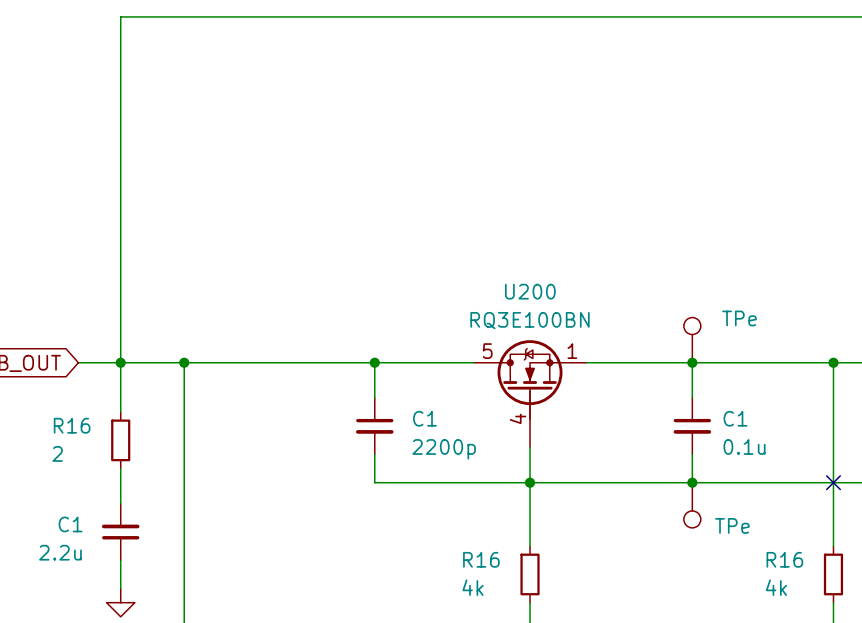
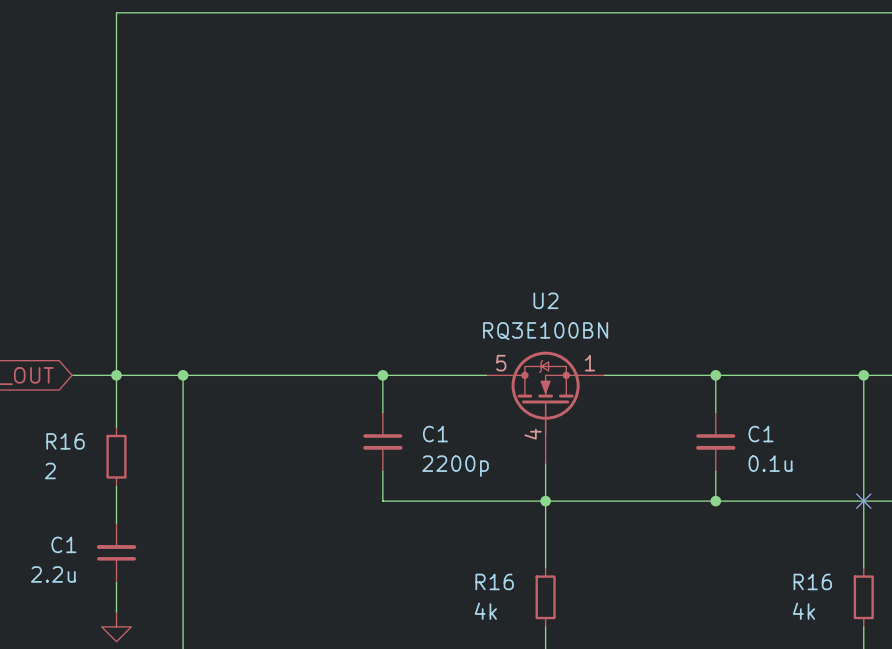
U200 name: U200 (530, 291) -> U2 (545, 300)
TPe: (692, 340) -> none
TPe: (692, 505) -> none

